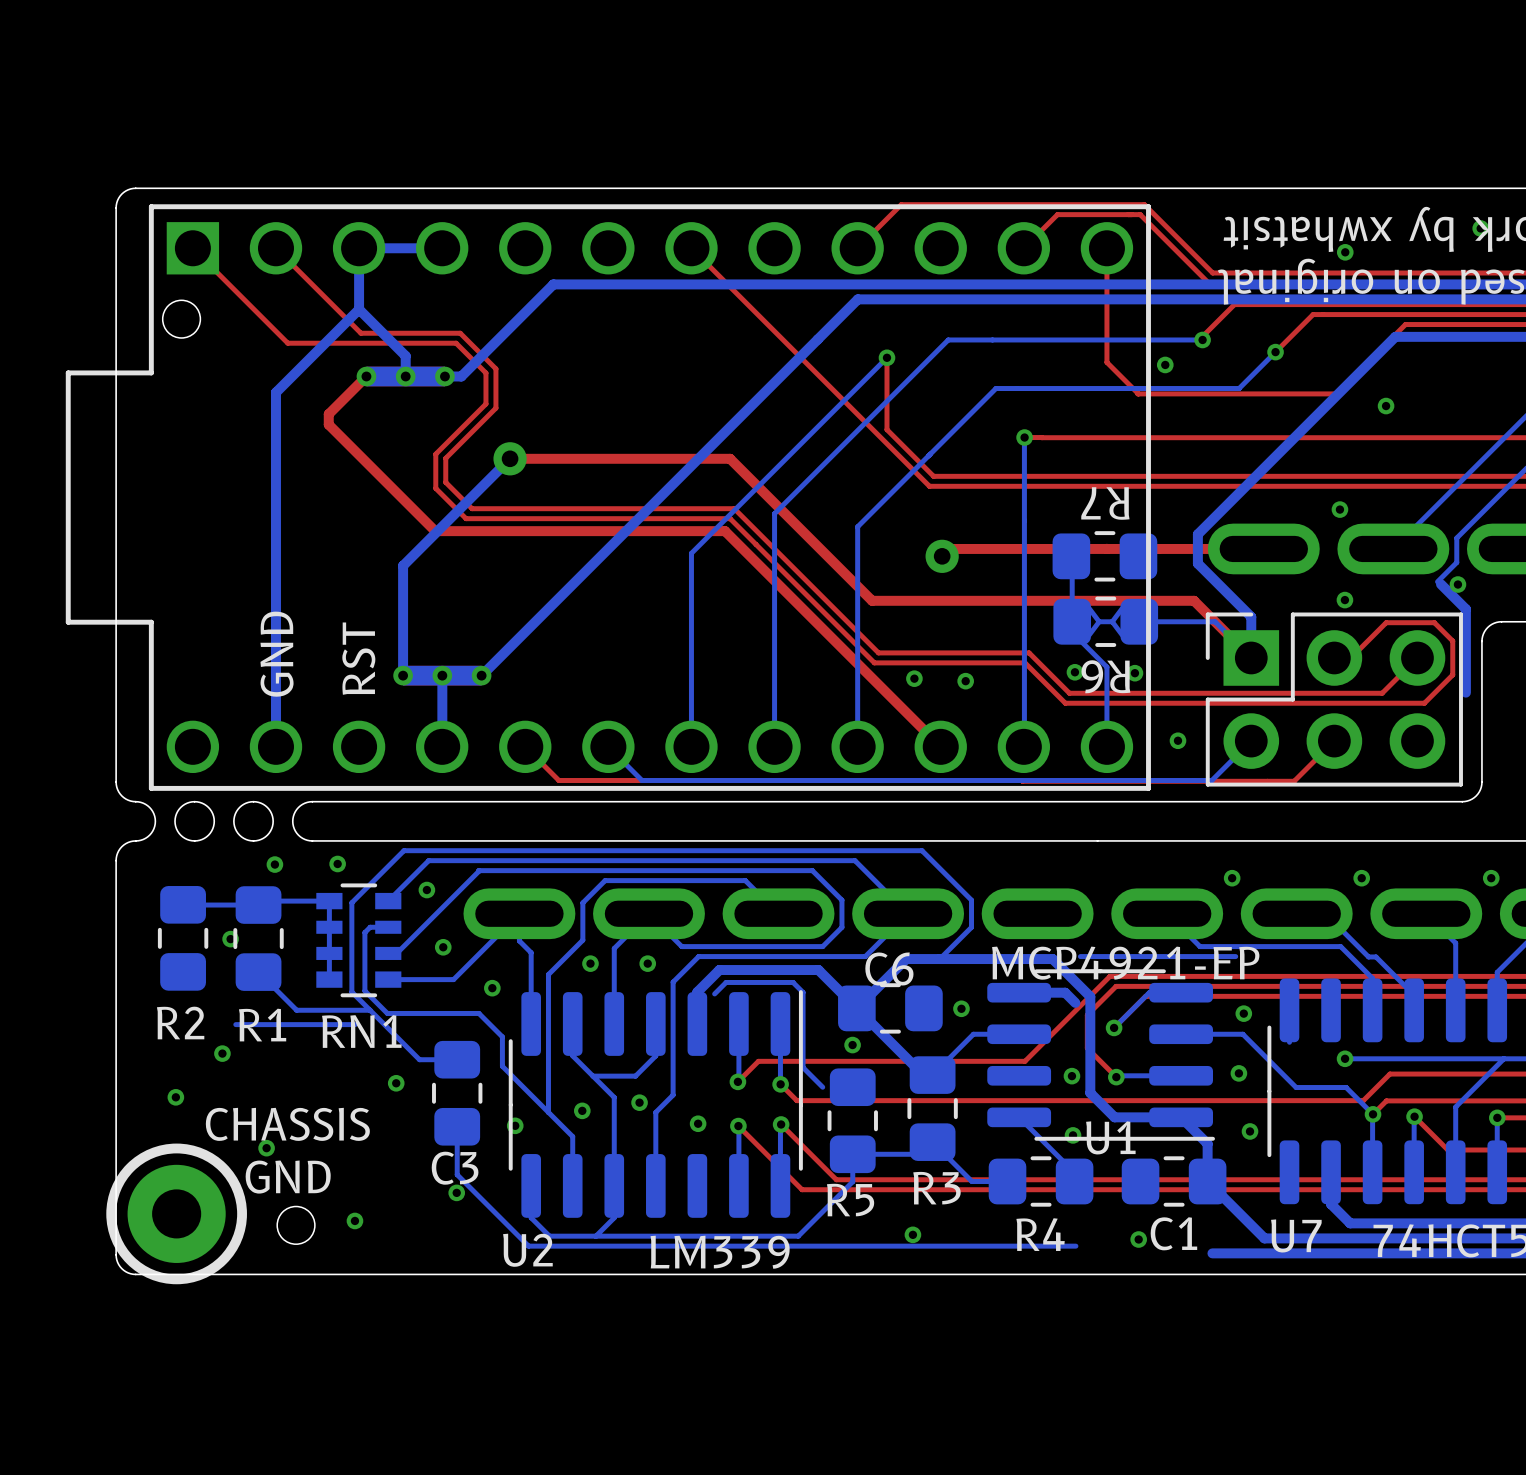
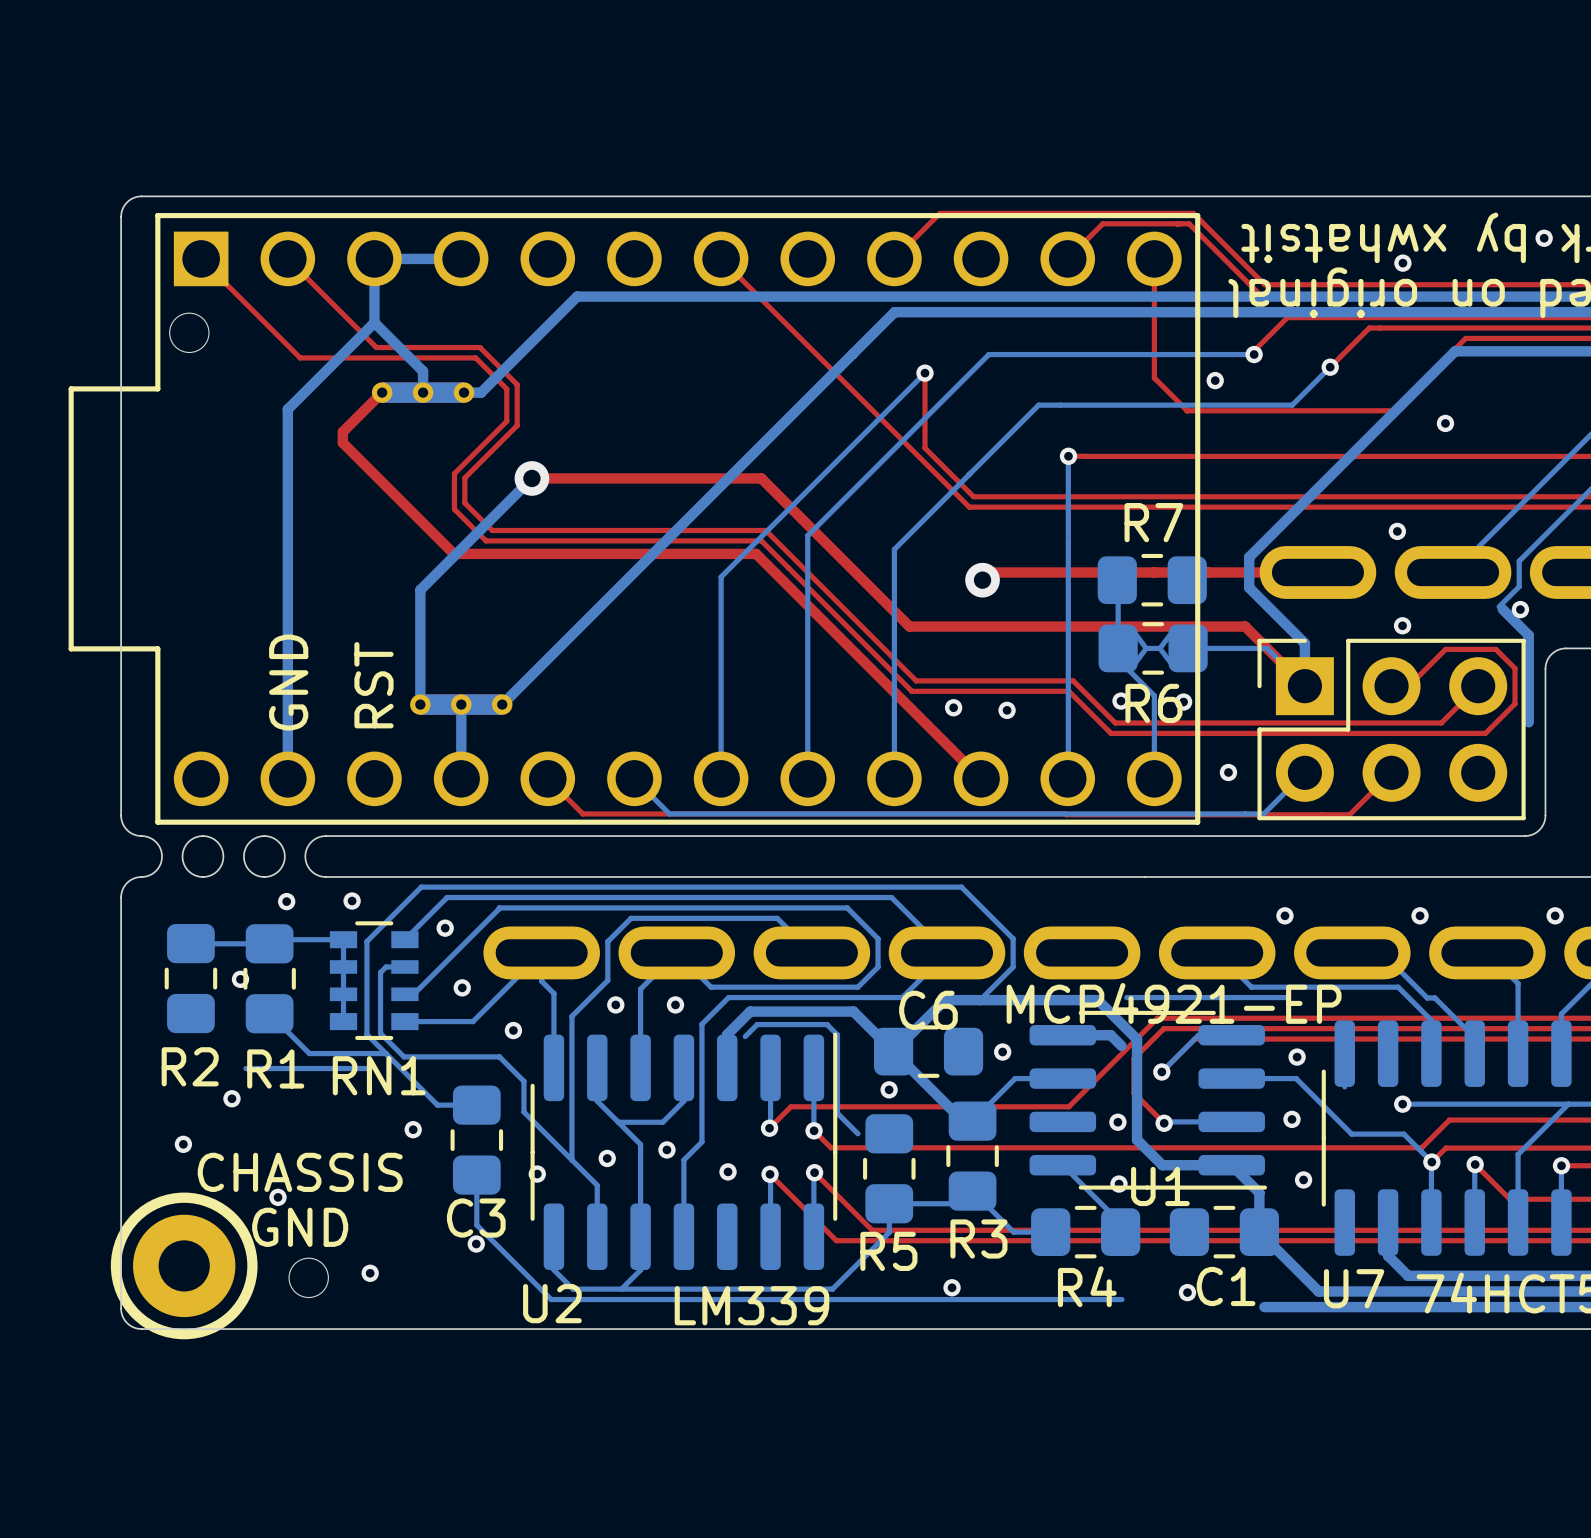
R7 name rotation: 0° (1105, 503) -> 180° (1153, 522)
R6 name rotation: 0° (1105, 676) -> 180° (1153, 703)

